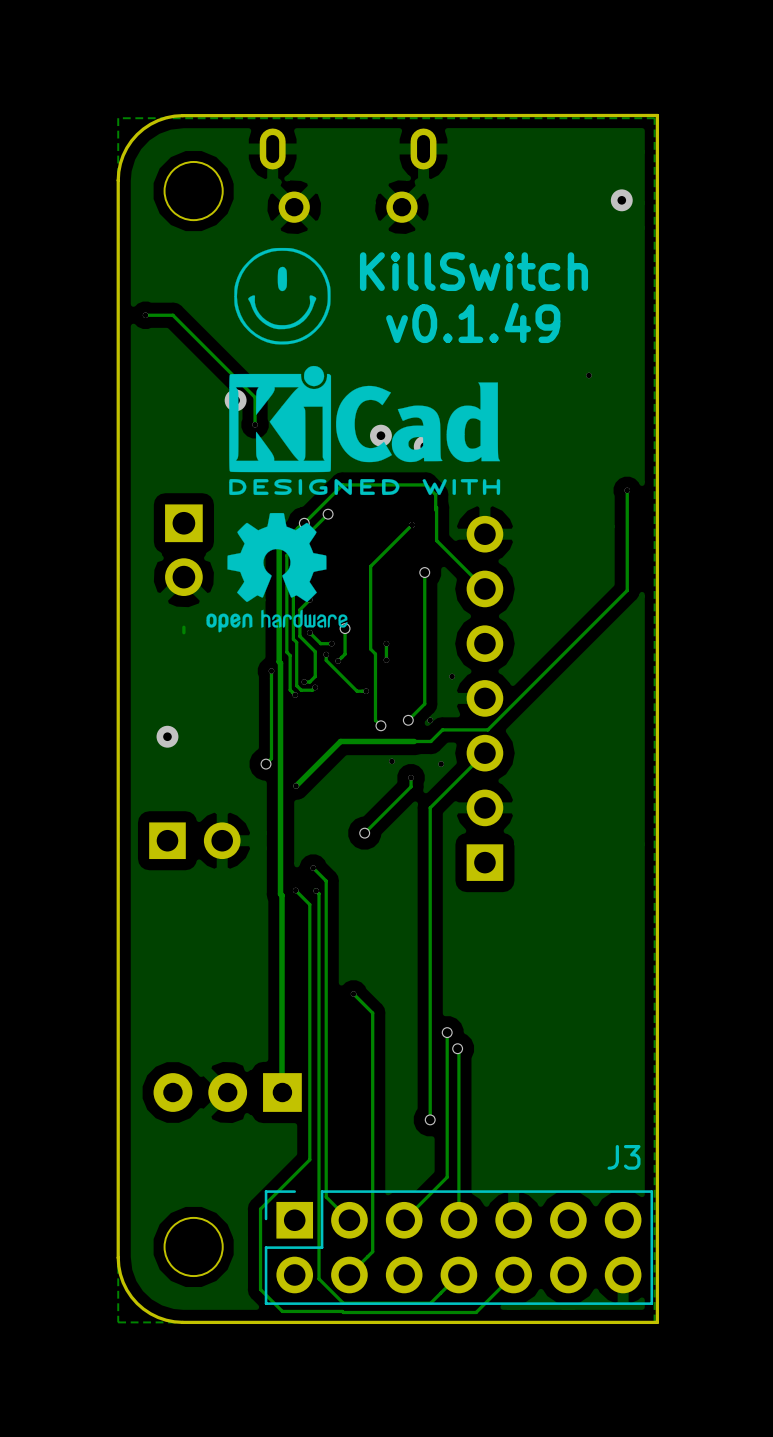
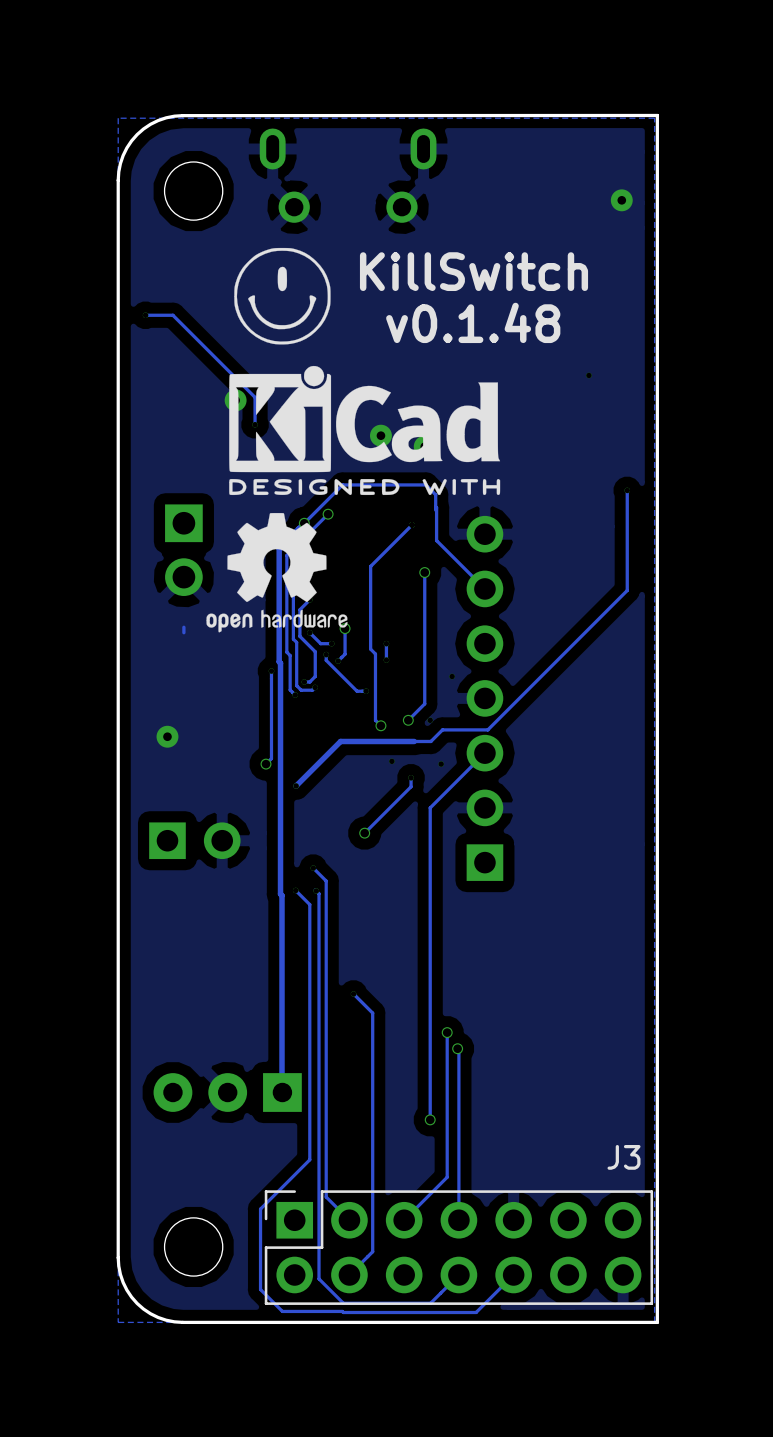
text: v0.1.49 (473, 322) -> v0.1.48 (473, 322)

